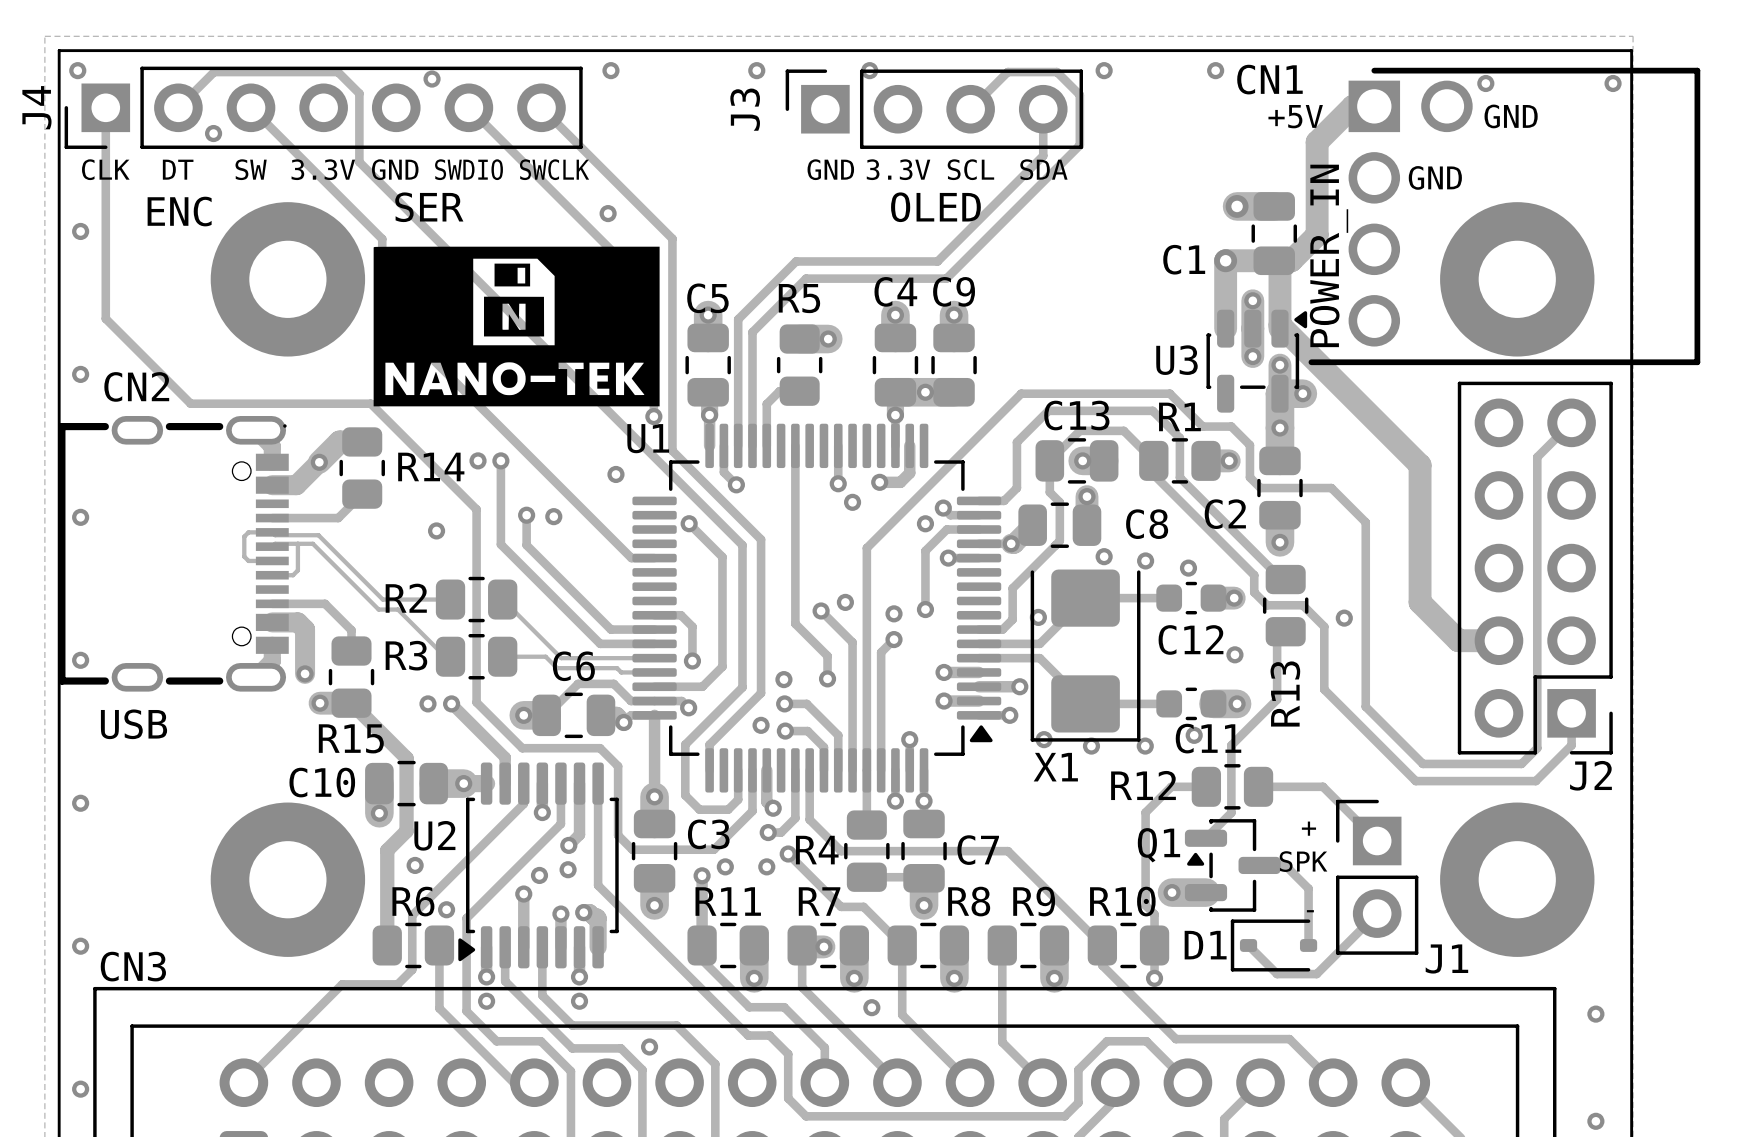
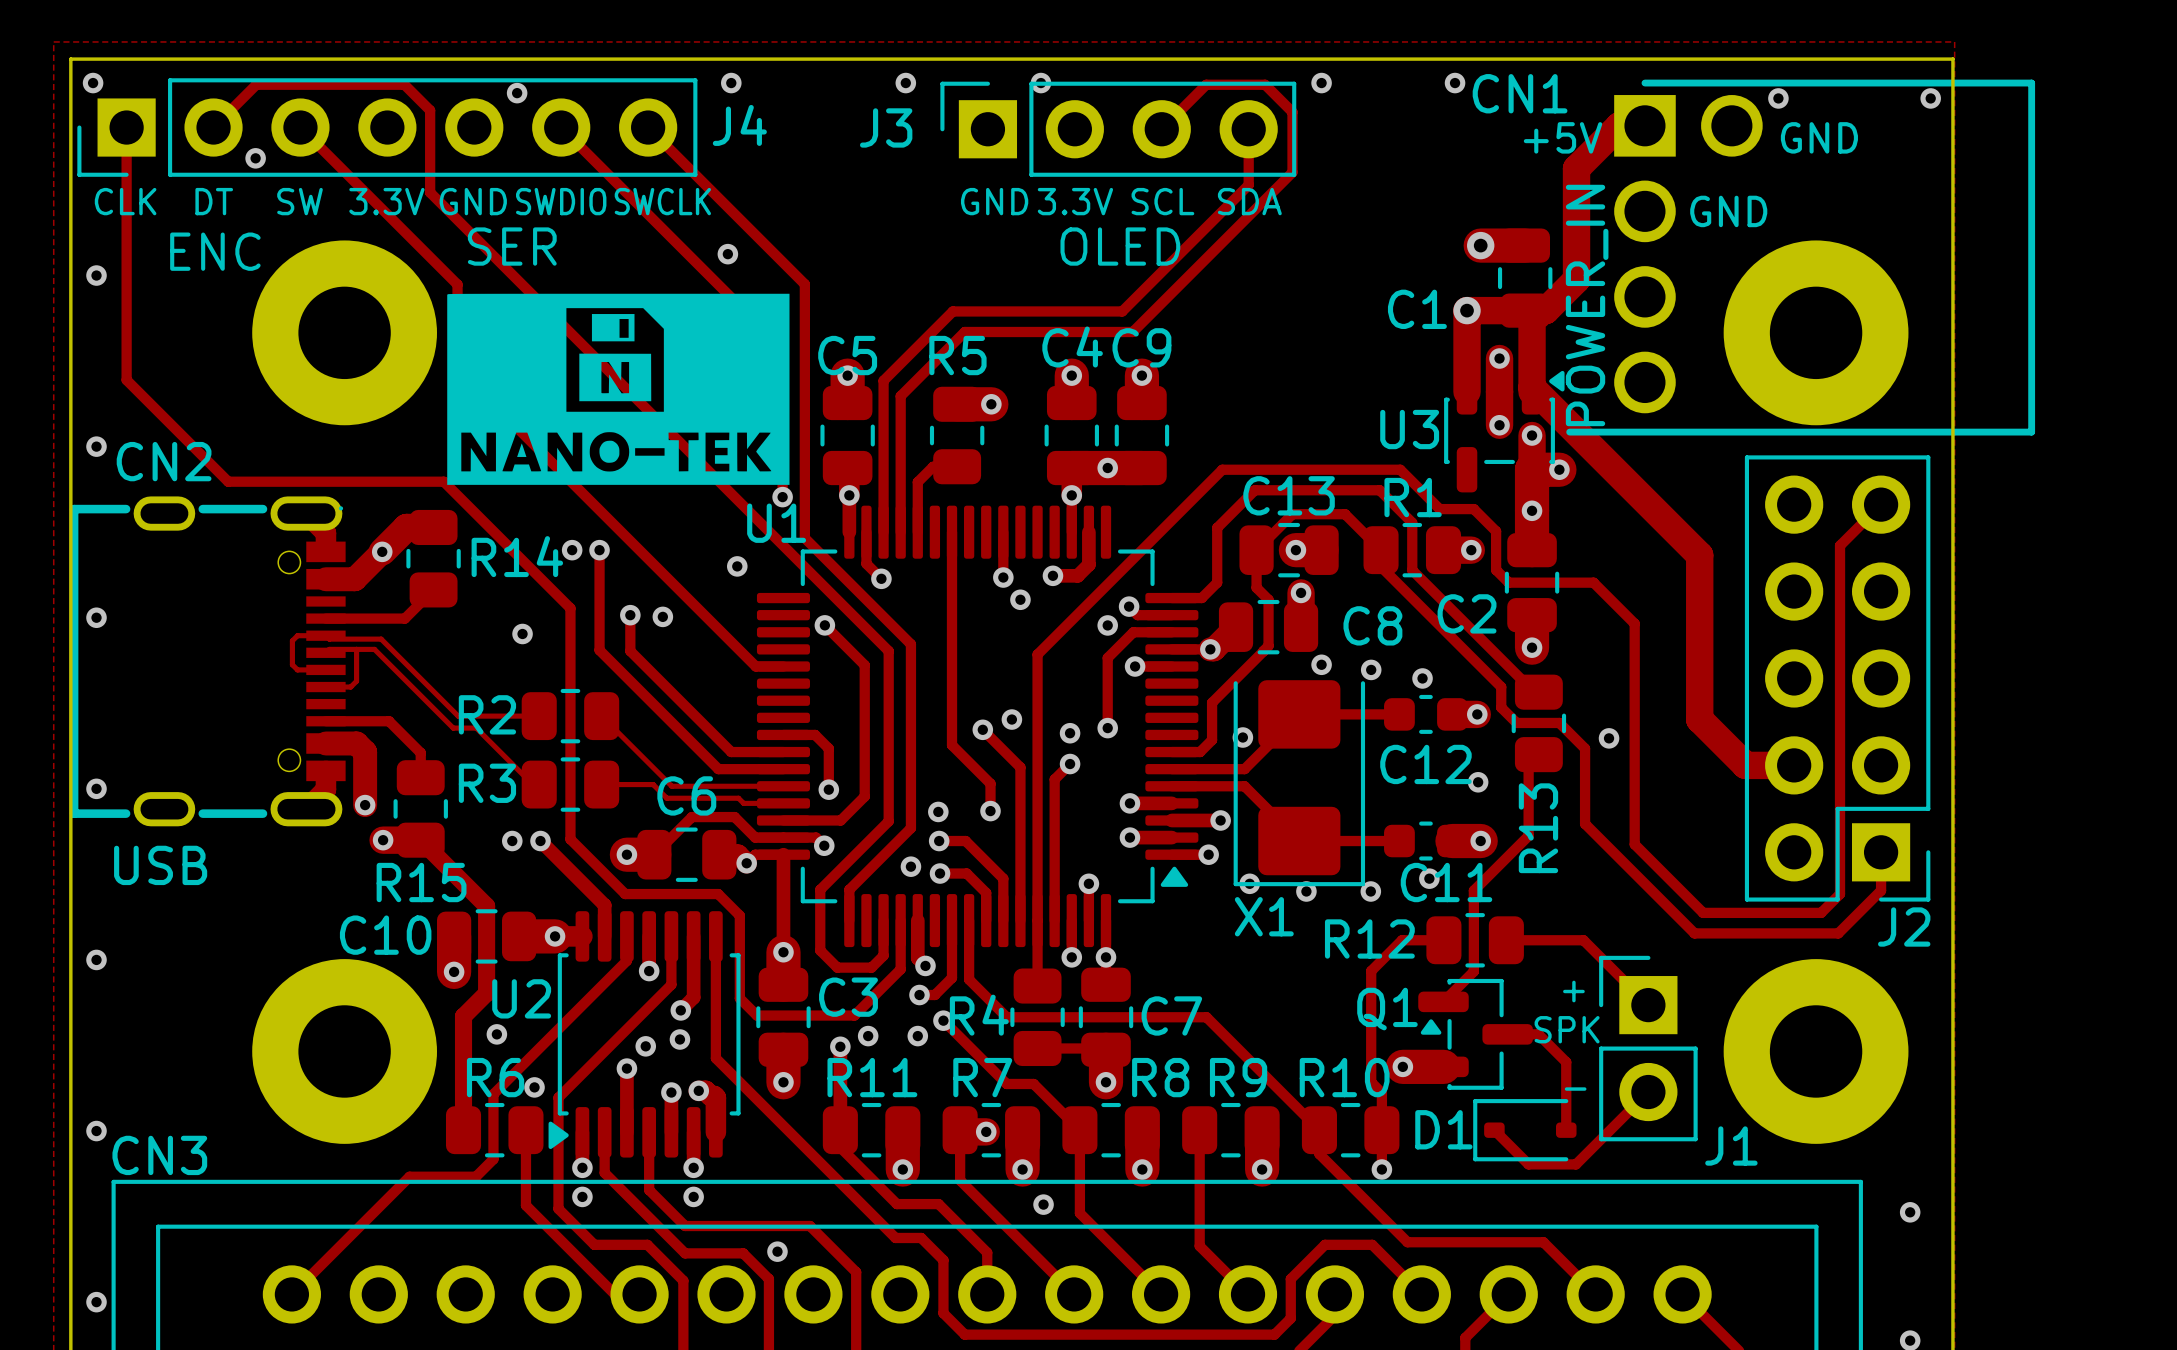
J4 name rotation: 0° (36, 107) -> 90° clockwise (739, 125)
J4 name position: J4 (36, 107) -> J4 (739, 125)
J3 name rotation: 0° (745, 109) -> 90° clockwise (886, 127)

